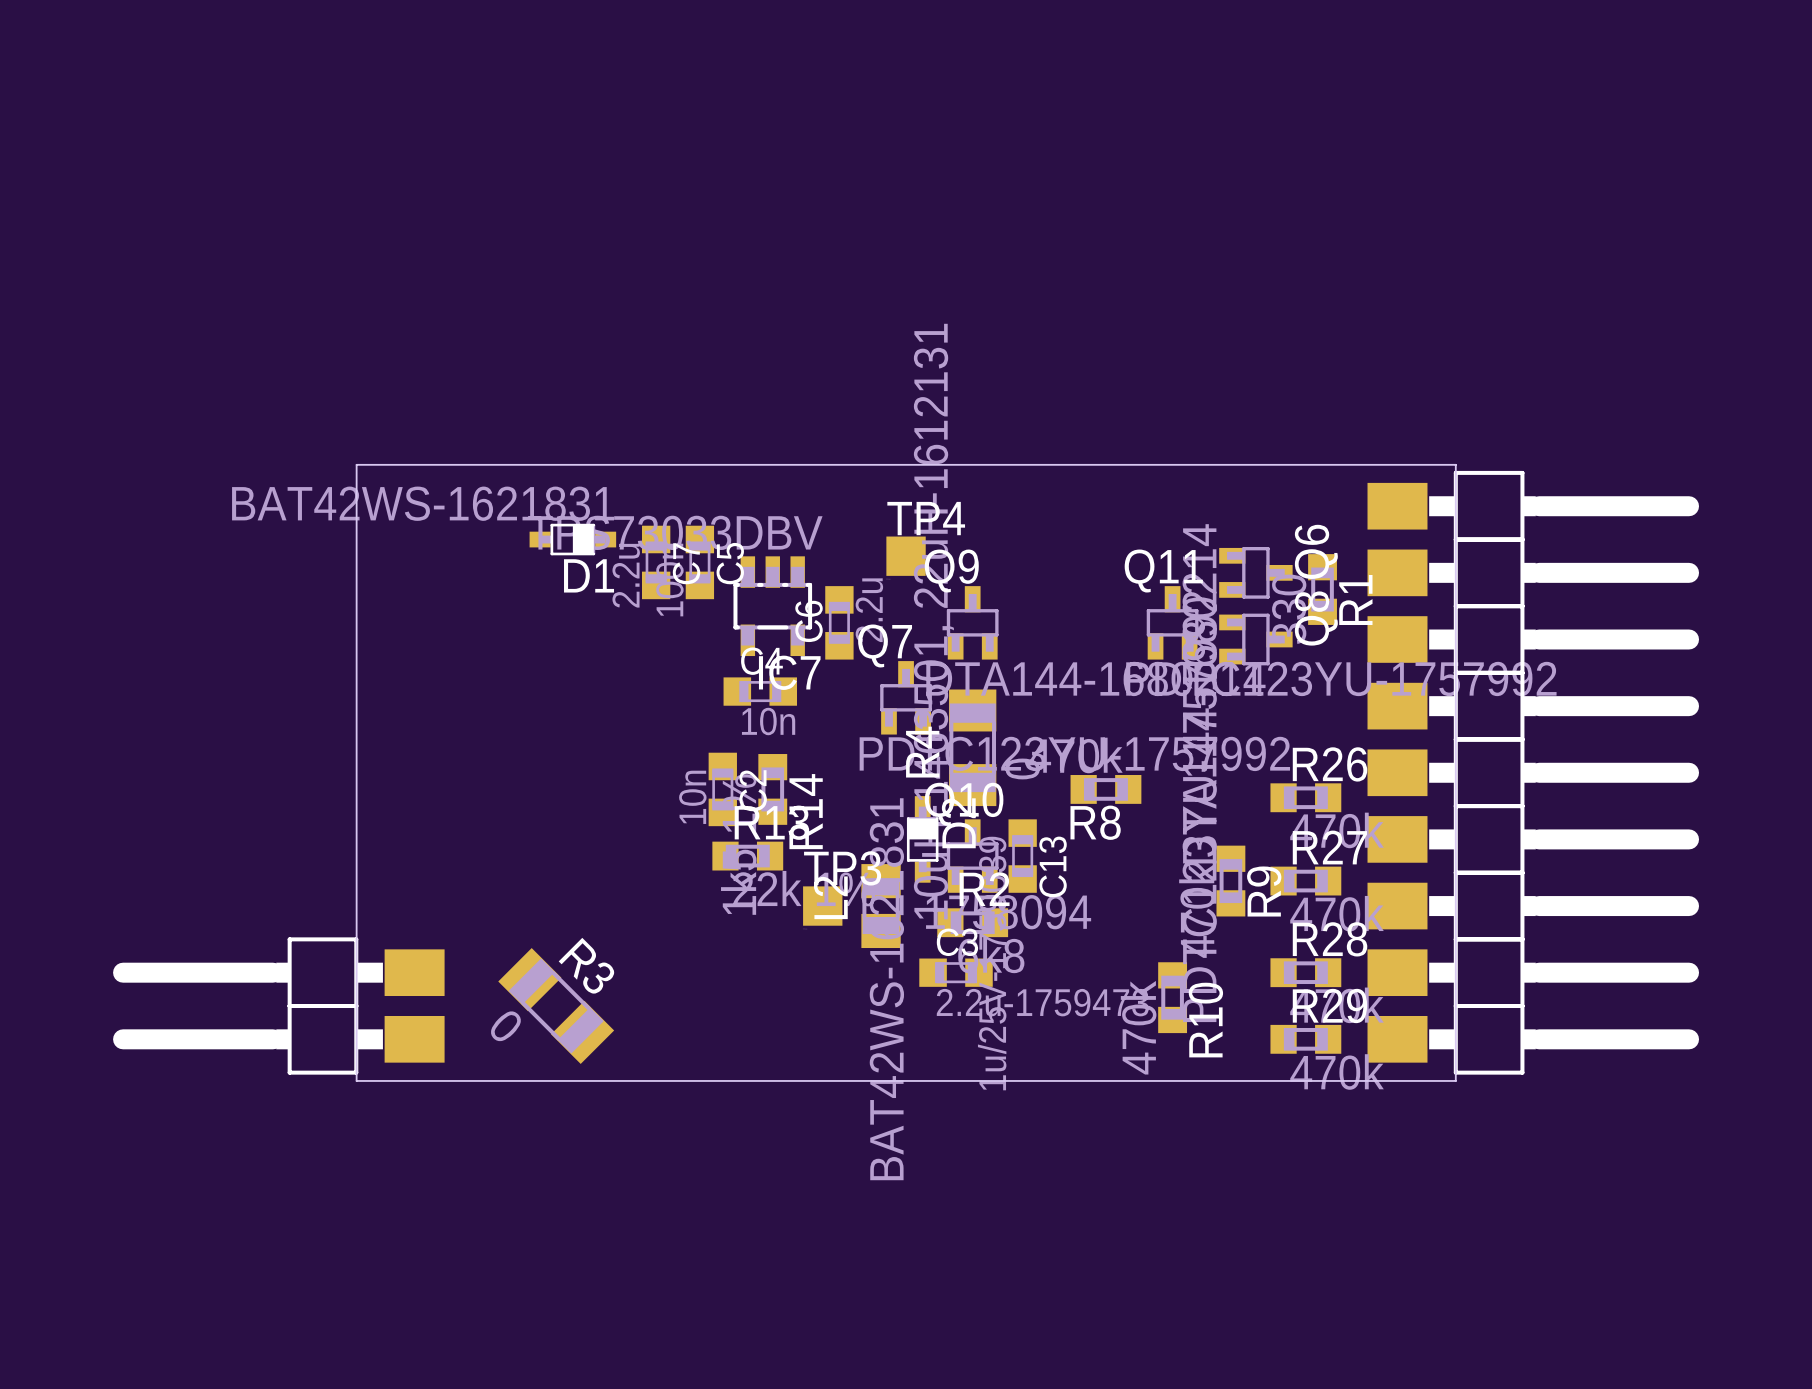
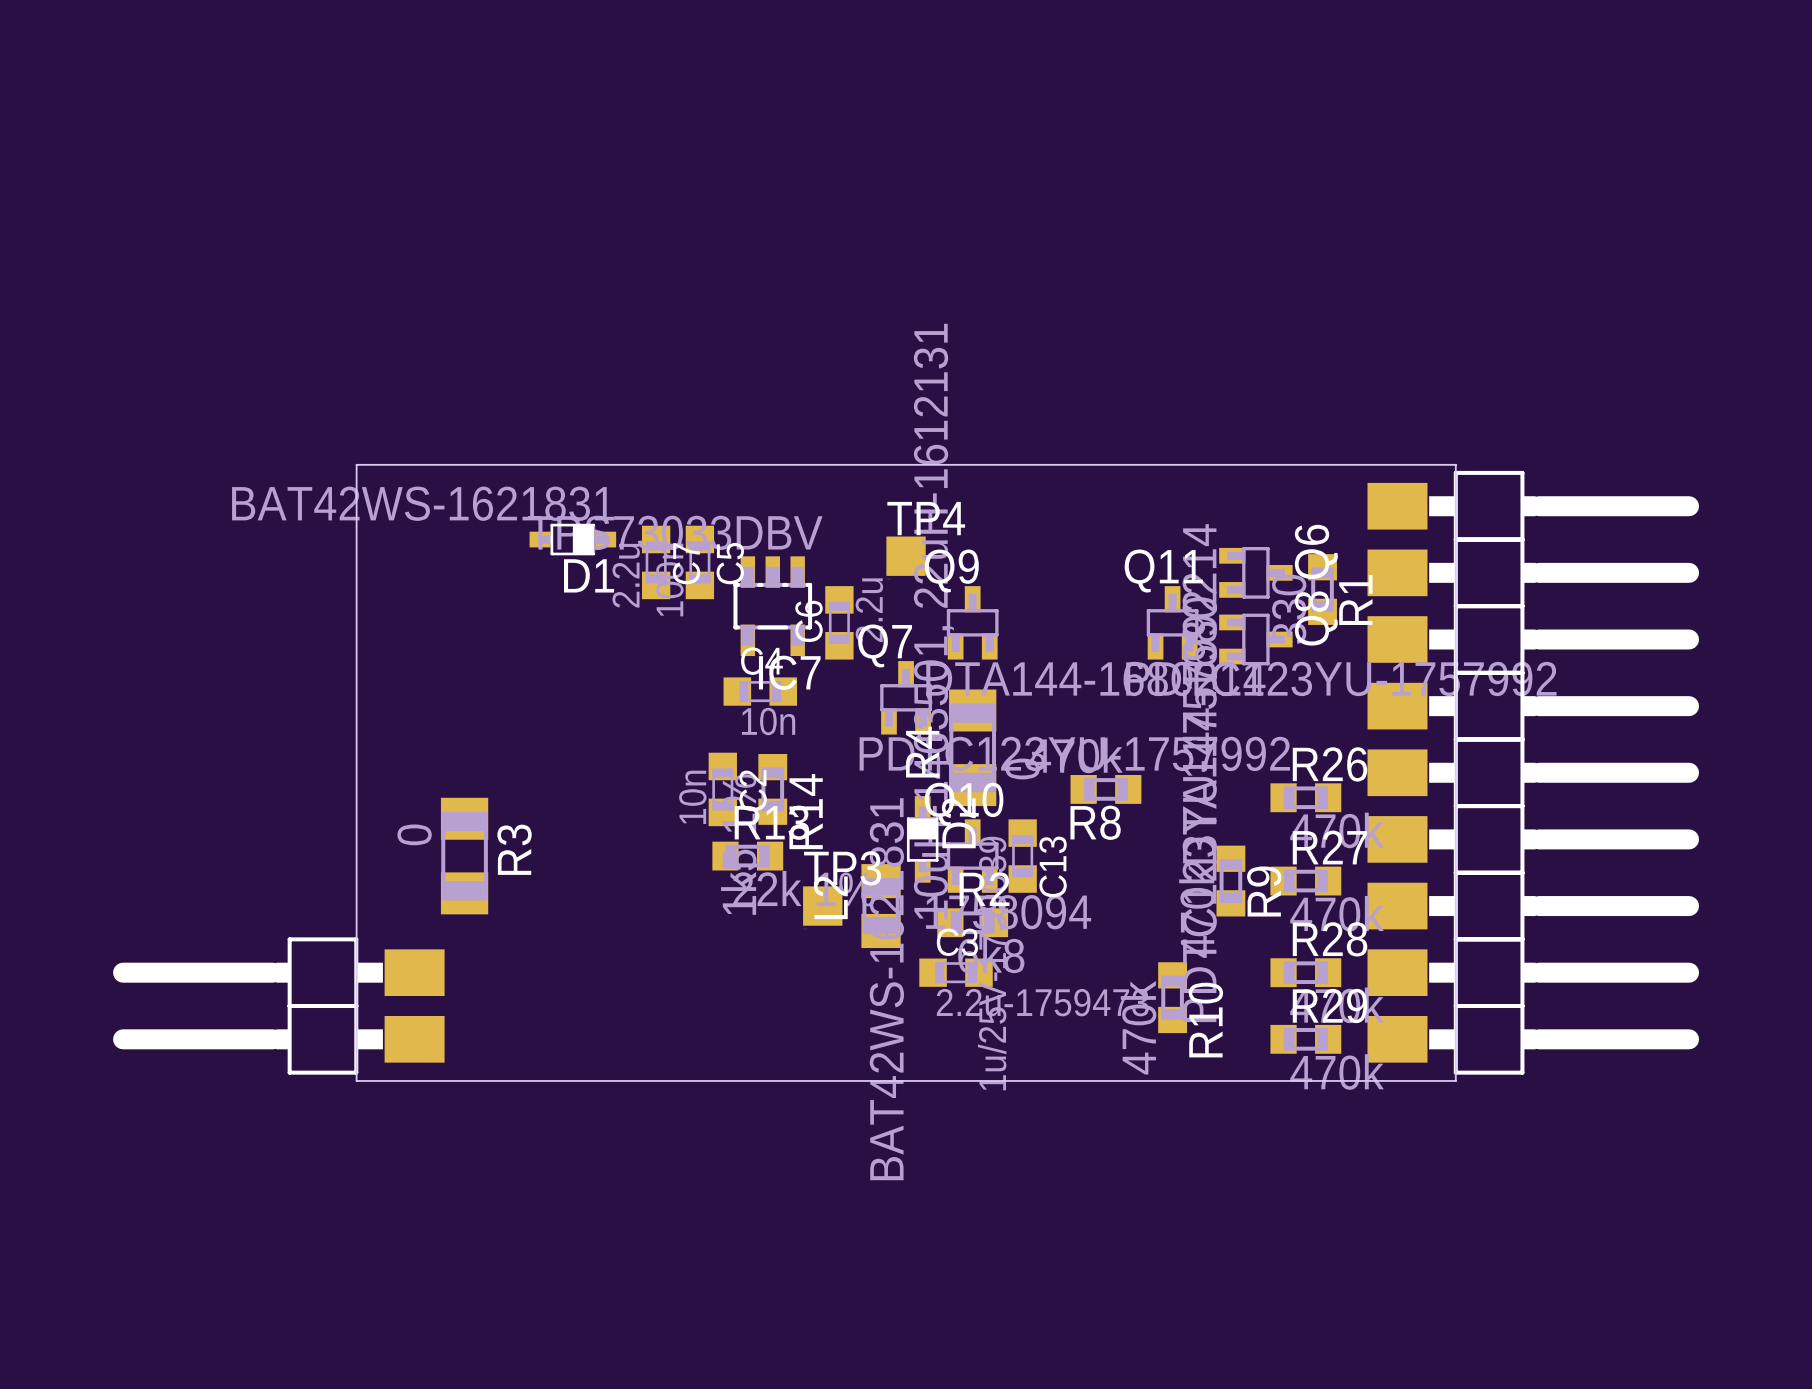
R3 rotation: 0° (556, 1006) -> 45° clockwise (464, 856)
R3 position: (556, 1006) -> (464, 856)

